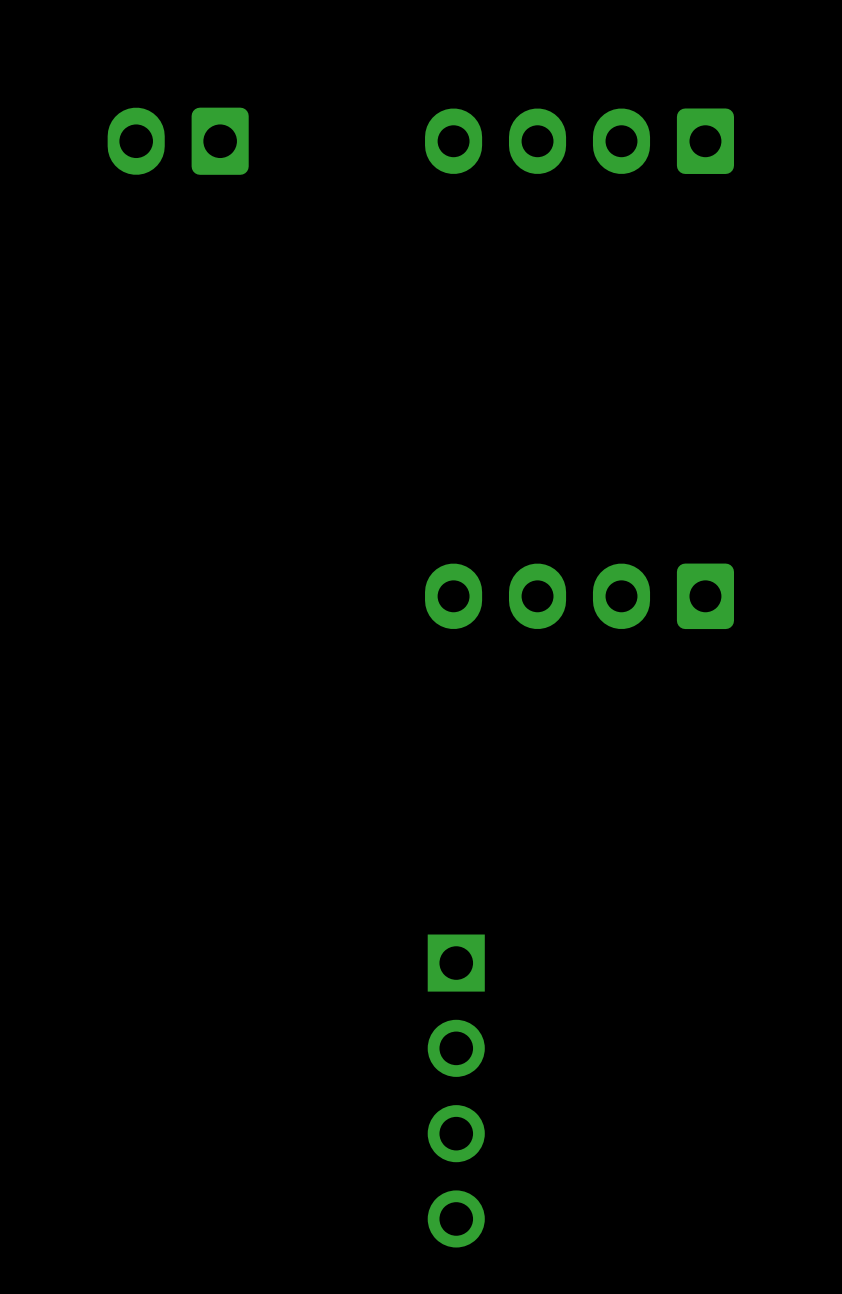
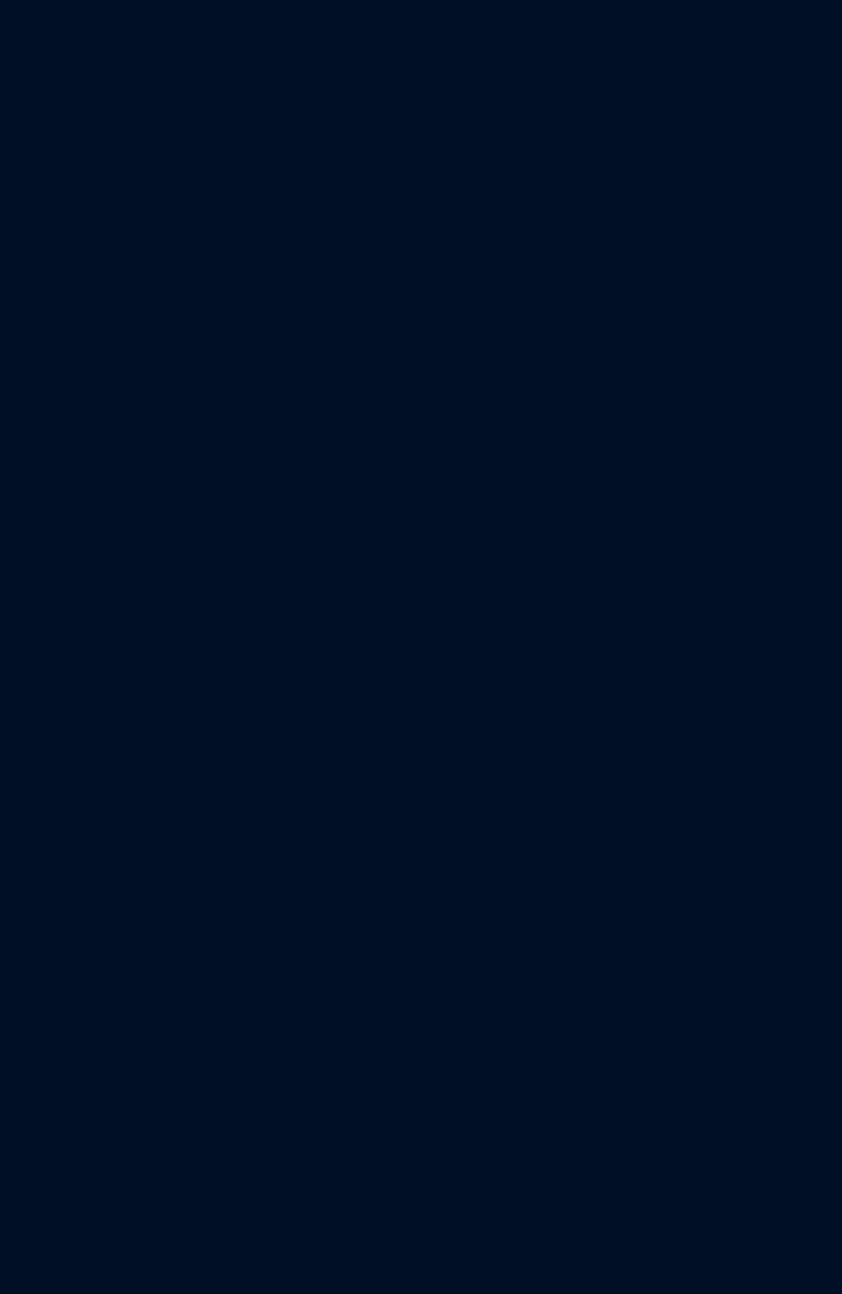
part: (178, 141) -> none
part: (579, 141) -> none
part: (579, 596) -> none
part: (456, 1091) -> none

